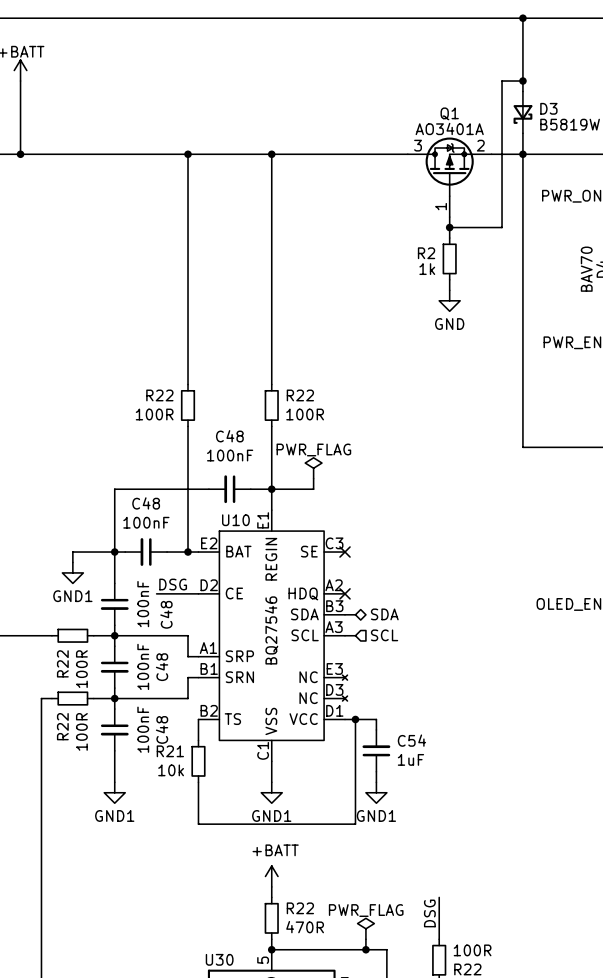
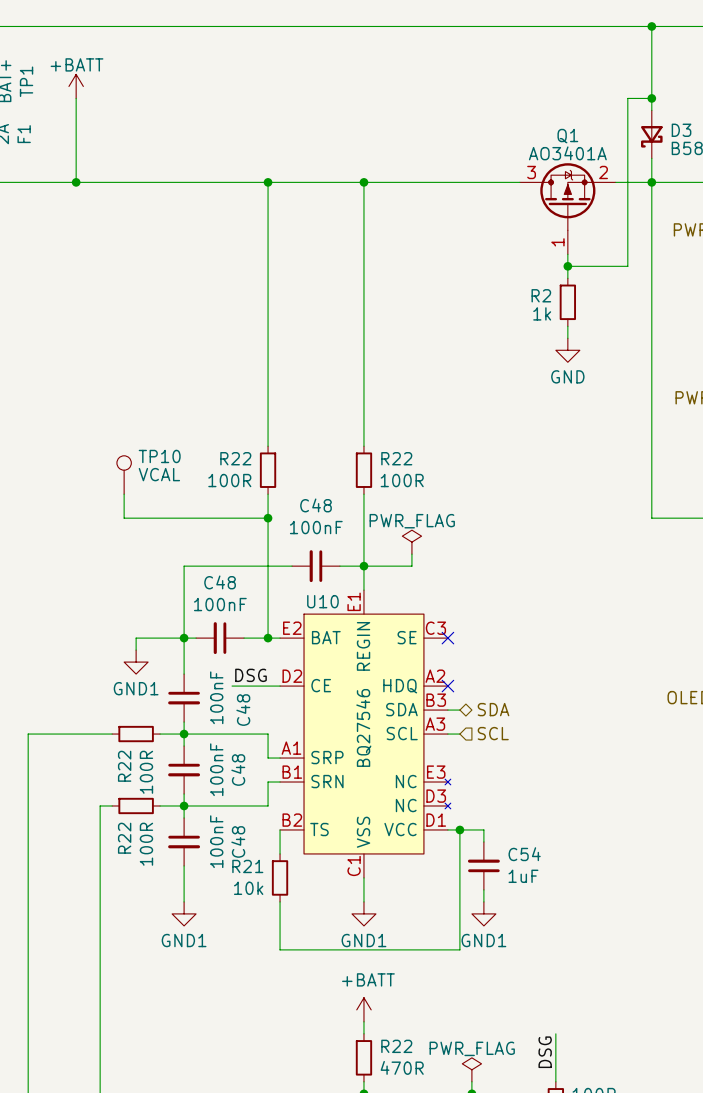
TP10: none -> VCAL (124, 475)
wire: none -> (124, 494) (124, 518) (268, 518)
junction: none -> (268, 518)

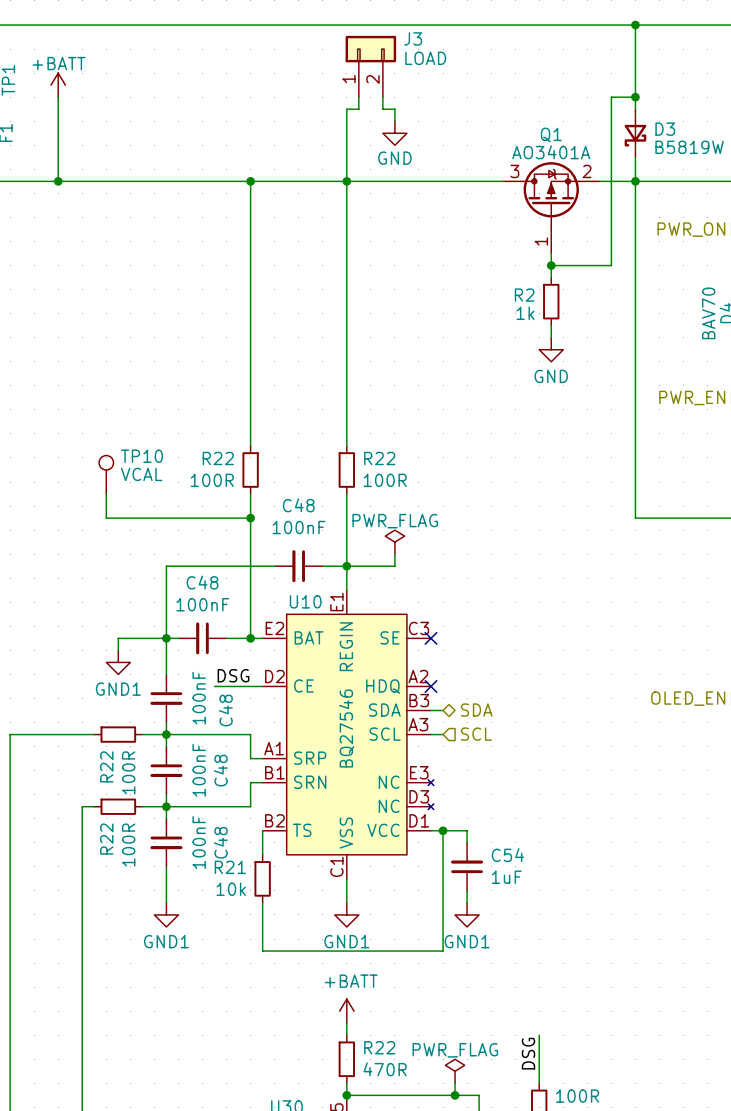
J3: none -> LOAD (370, 66)
wire: none -> (358, 97) (358, 109) (346, 109) (346, 181)
wire: none -> (382, 97) (382, 109) (394, 109) (394, 121)
power symbol: none -> GND (394, 133)

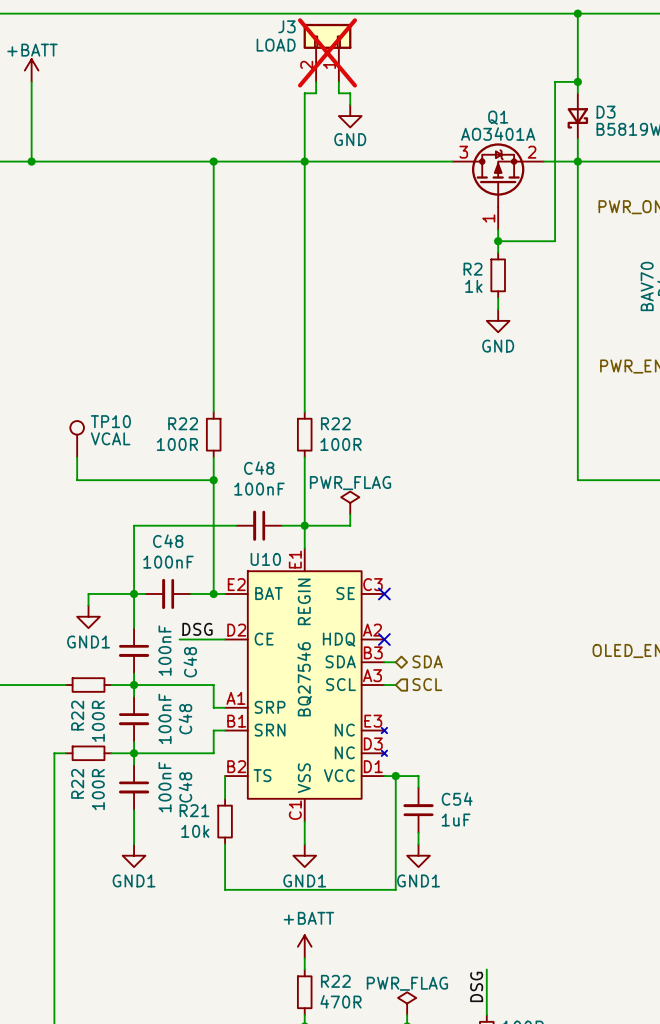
J3 flip: as is (370, 49) -> left-right (327, 36)
J3 do-not-place cross: none -> (327, 52)

